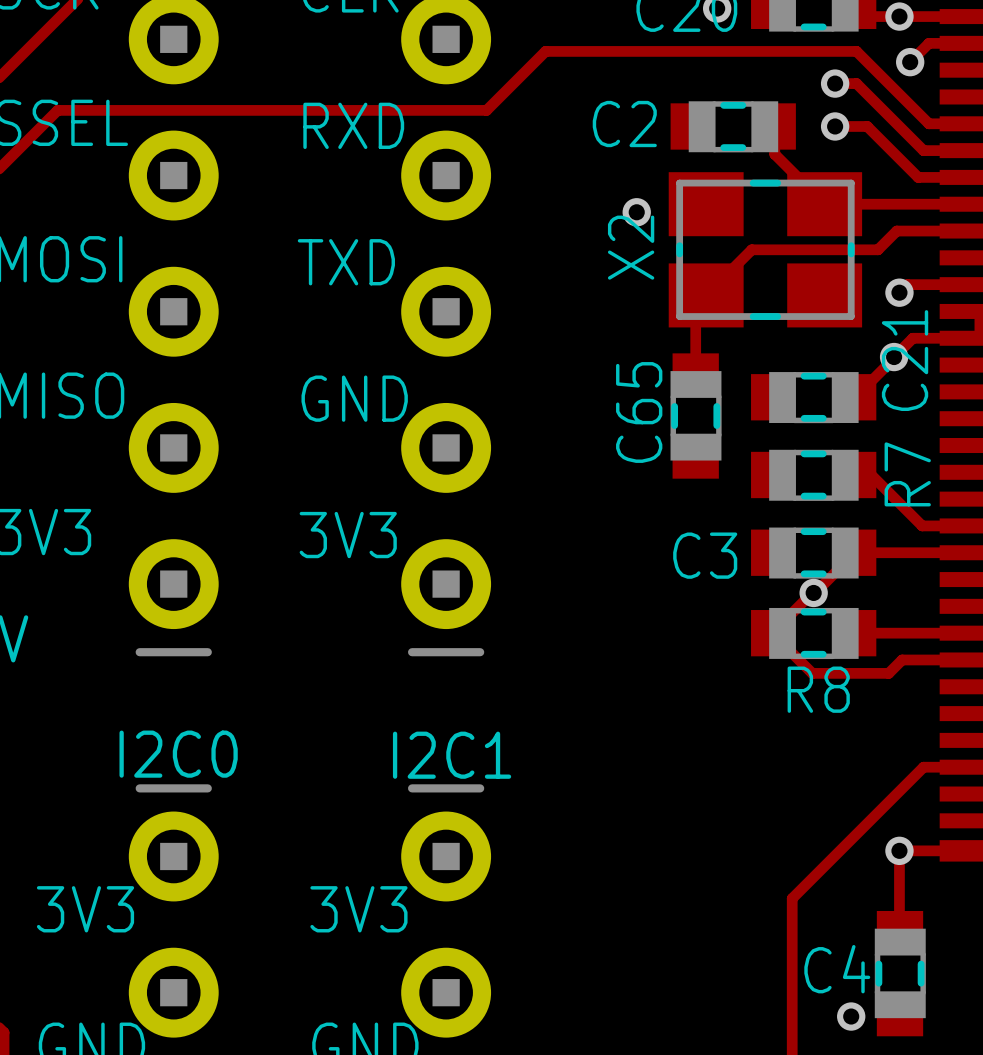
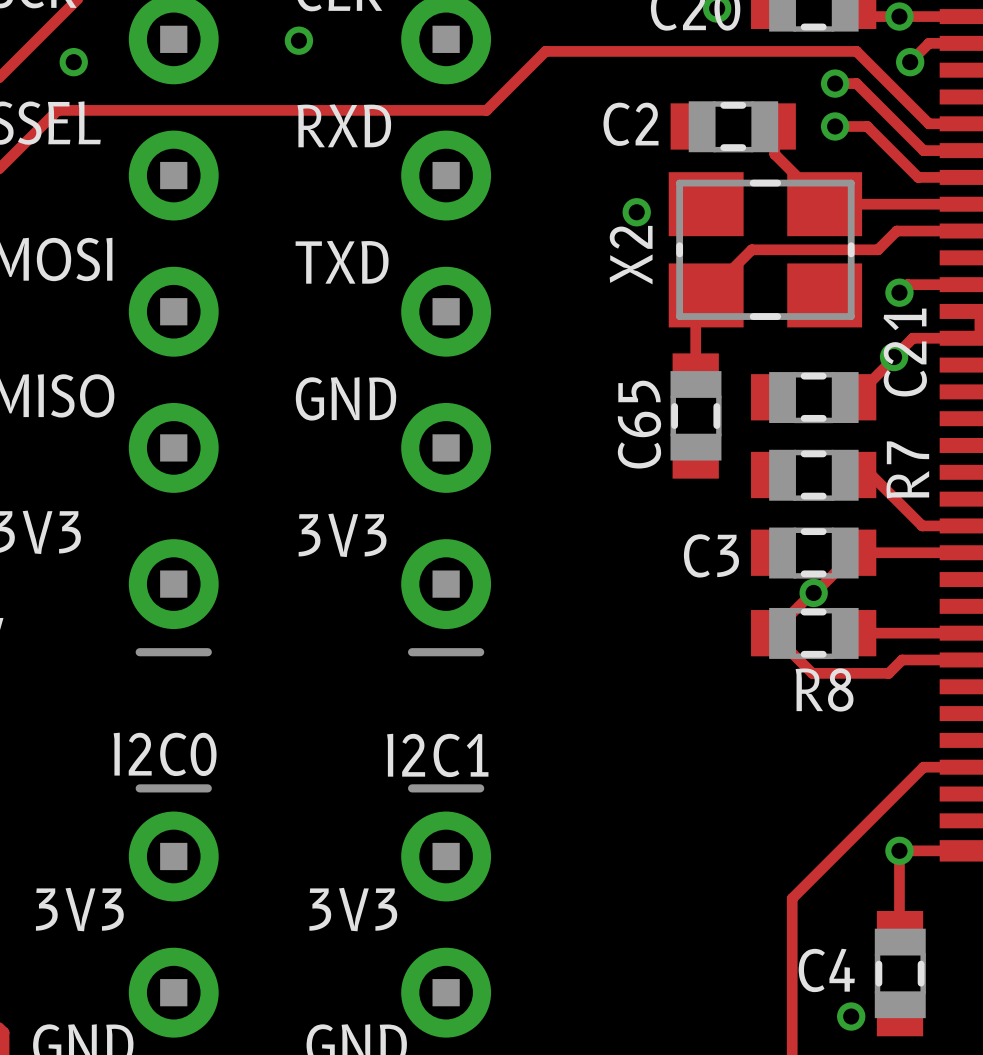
via: none -> (298, 40)
via: none -> (73, 62)

